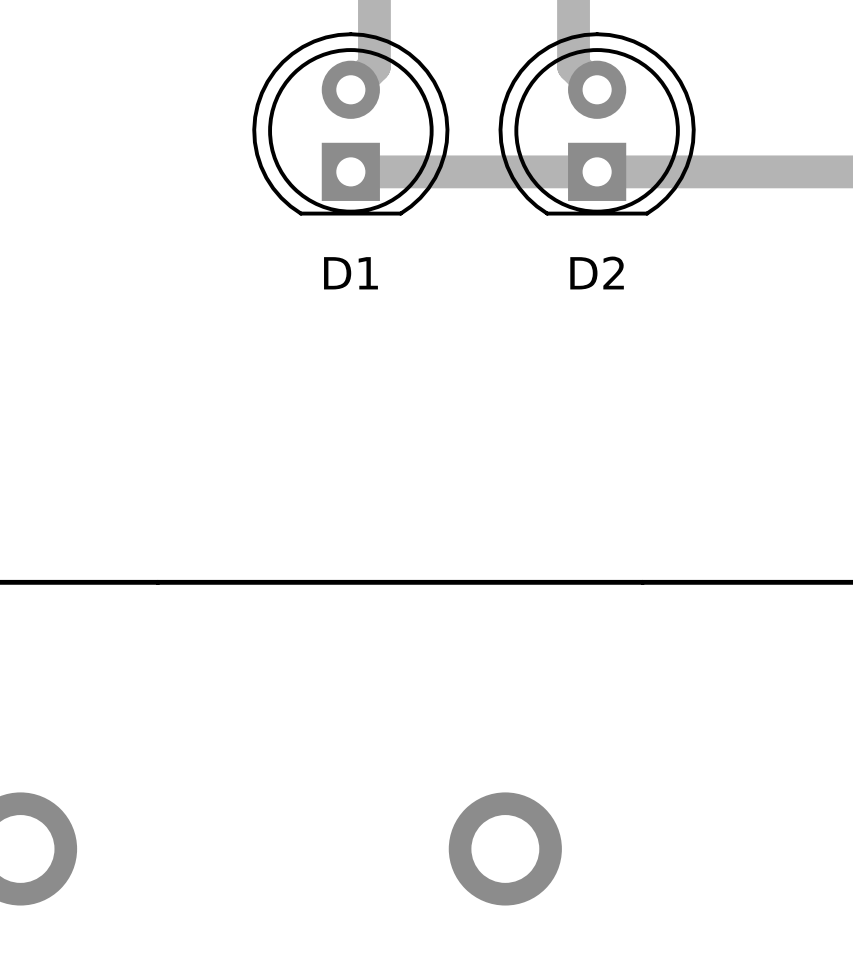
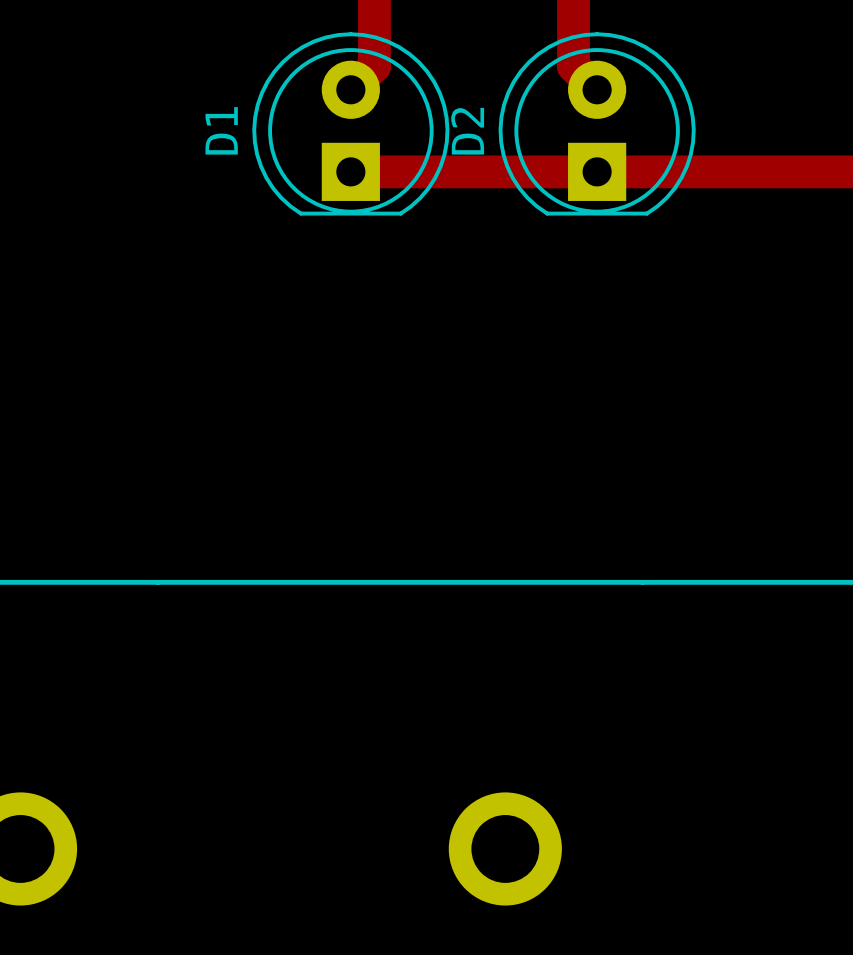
D2 name rotation: 0° (597, 272) -> 90° counterclockwise (467, 131)
D2 name position: D2 (597, 272) -> D2 (467, 131)
D1 name rotation: 0° (350, 273) -> 90° counterclockwise (221, 130)
D1 name position: D1 (350, 273) -> D1 (221, 130)

